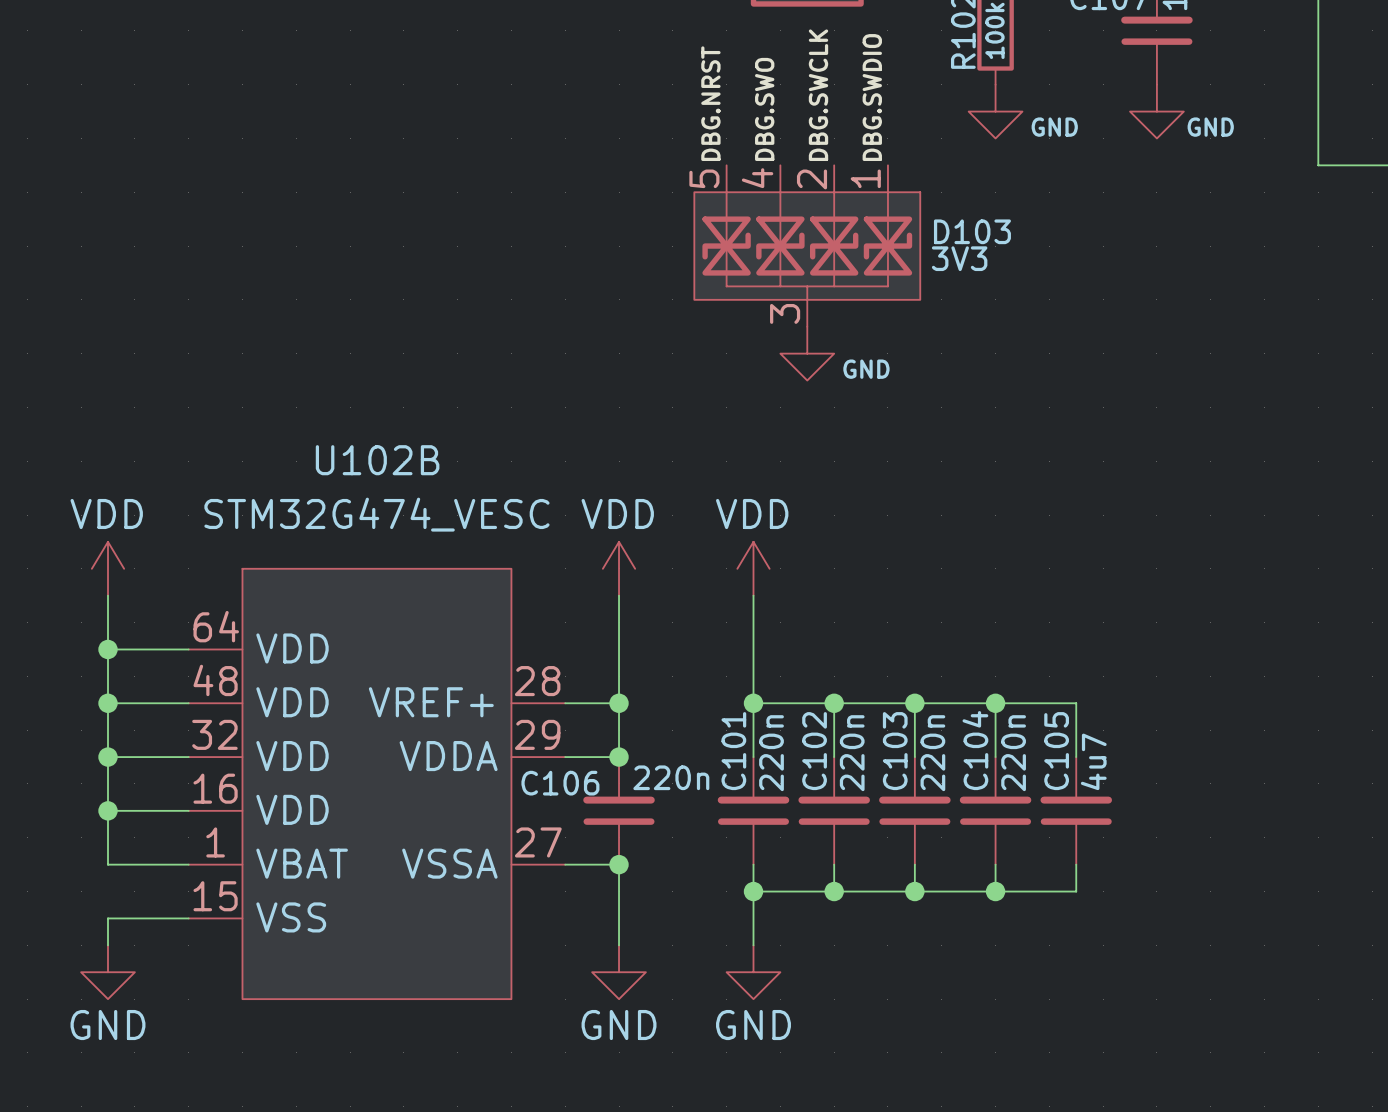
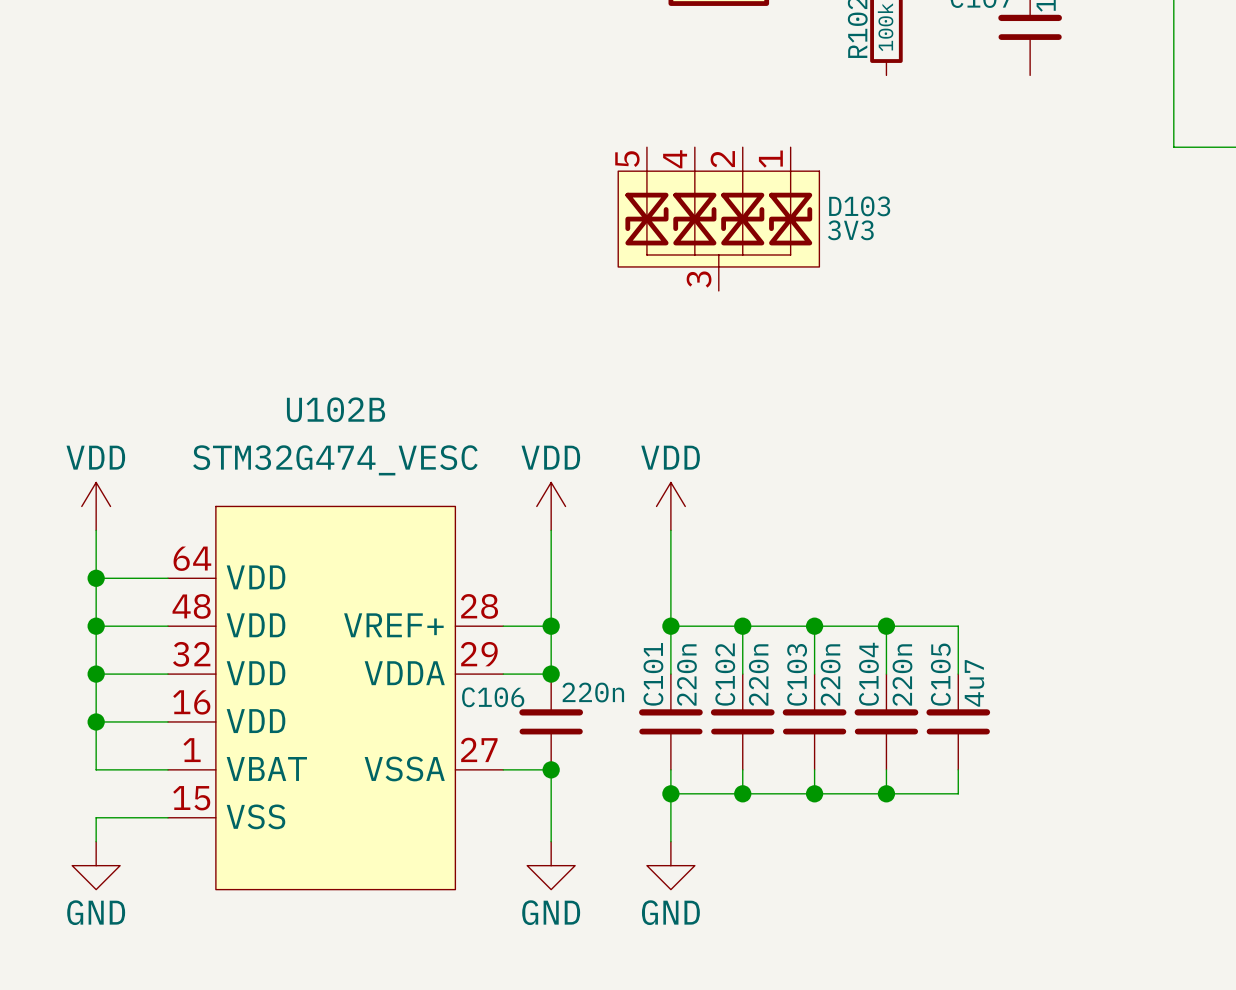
label: DBG.SWCLK (818, 95) -> none
label: DBG.SWDIO (872, 97) -> none
label: DBG.NRST (710, 103) -> none
label: DBG.SWO (764, 109) -> none
power symbol: GND (995, 111) -> none
power symbol: GND (1156, 111) -> none
power symbol: GND (807, 353) -> none

